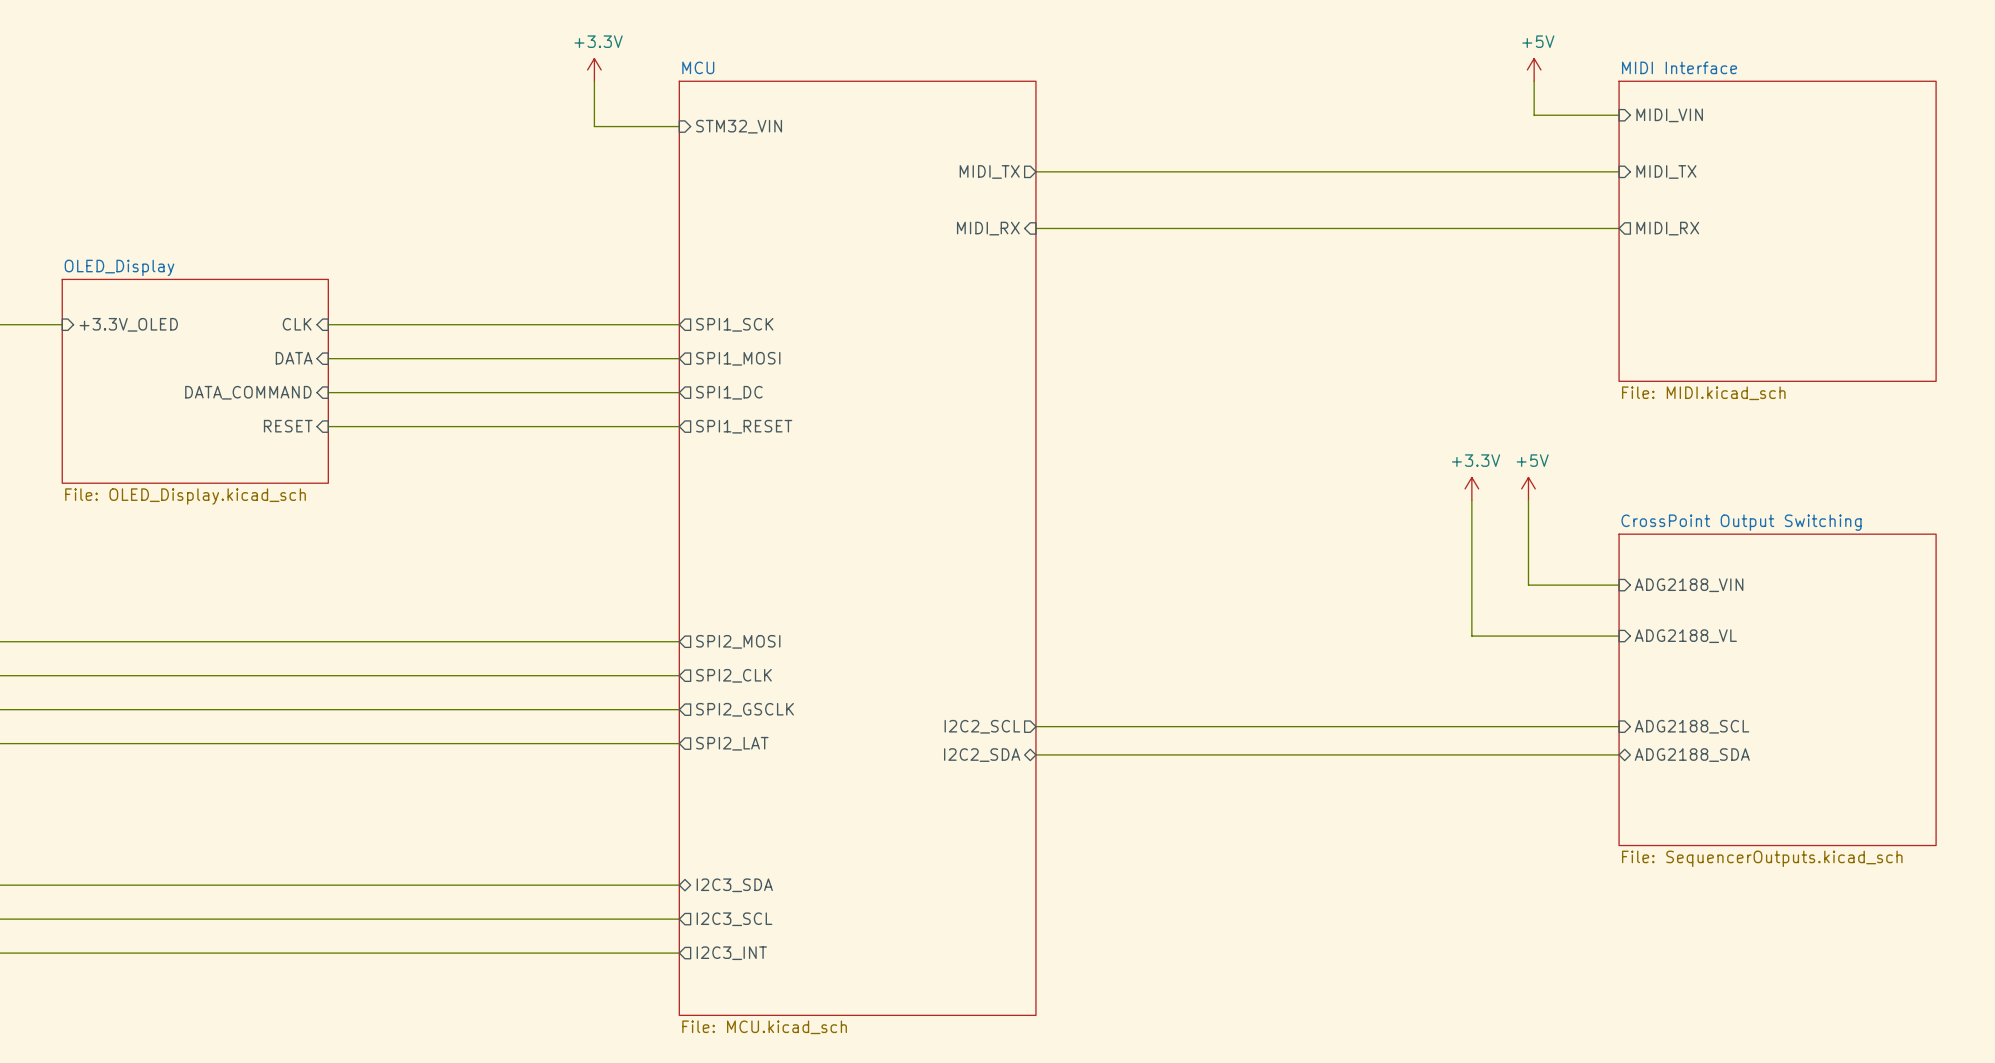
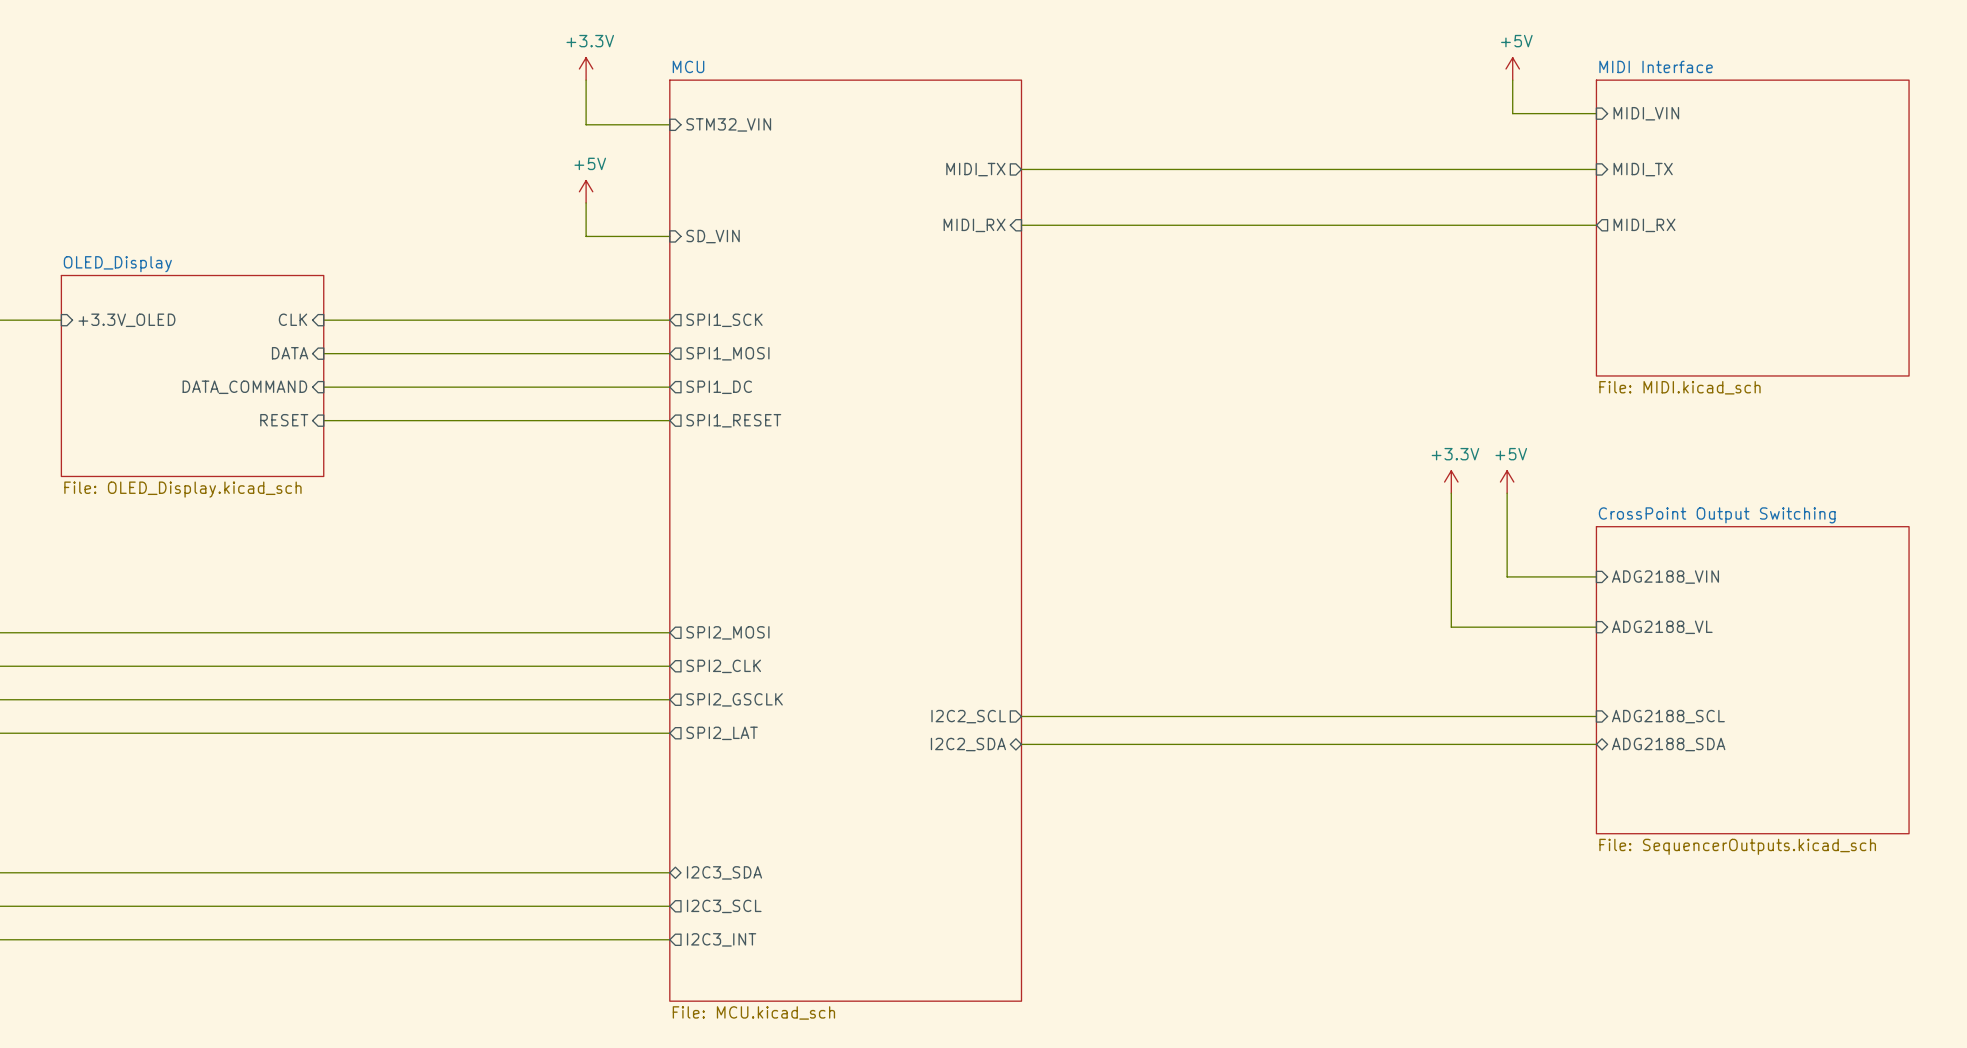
power symbol: none -> +5V (586, 191)
wire: none -> (586, 202) (586, 236) (669, 236)
sheet pin: none -> SD_VIN (713, 236)

